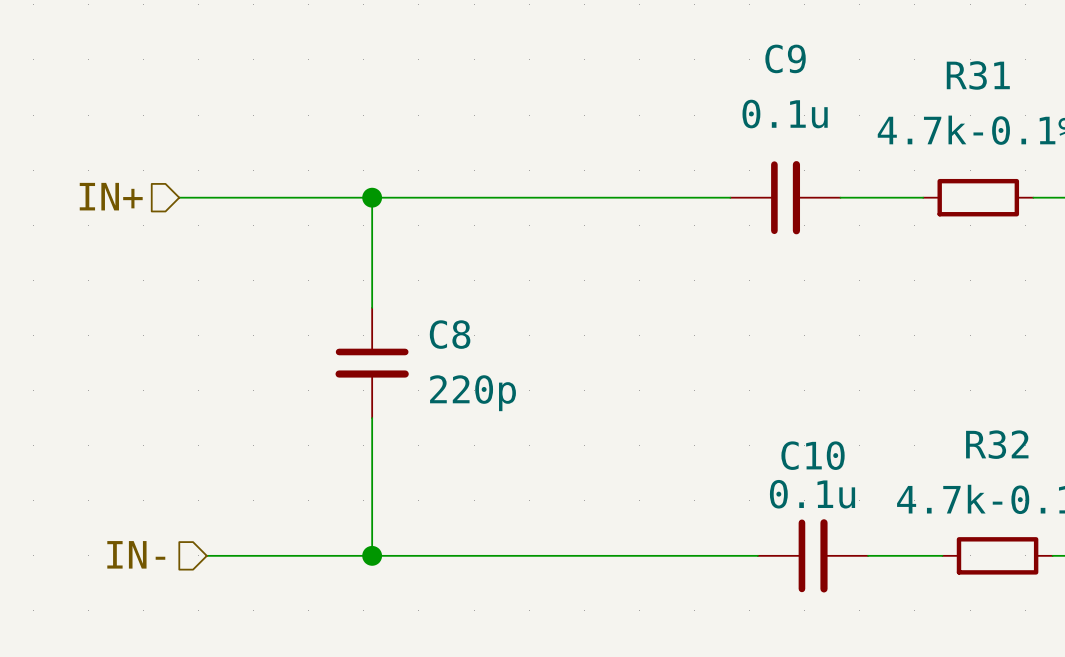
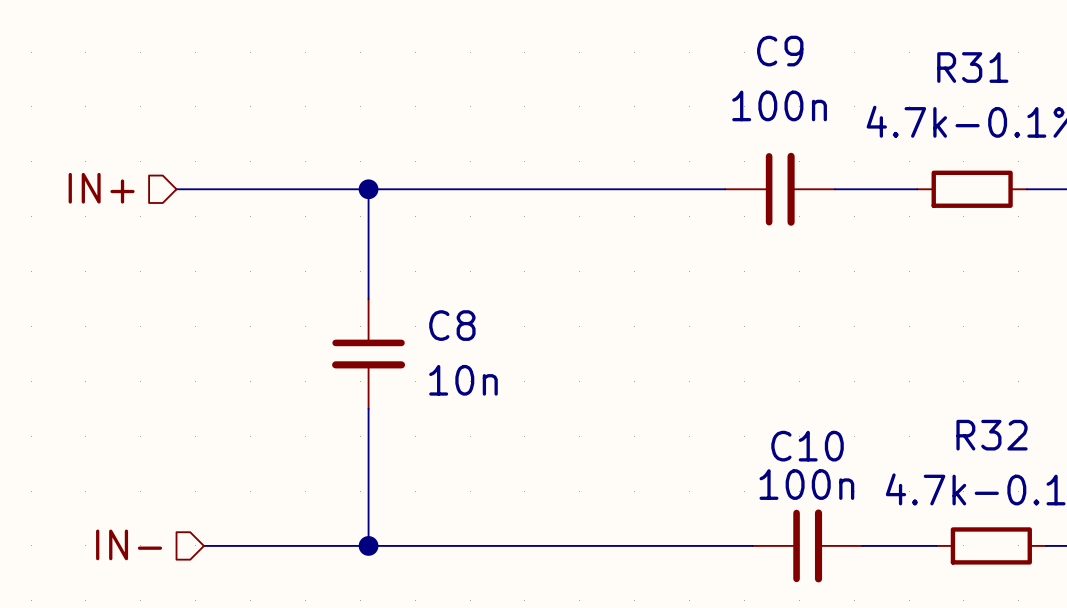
C9 value: 0.1u (785, 114) -> 100n (779, 105)
C8 value: 220p (473, 393) -> 10n (463, 380)
C10 value: 0.1u (812, 494) -> 100n (806, 484)

